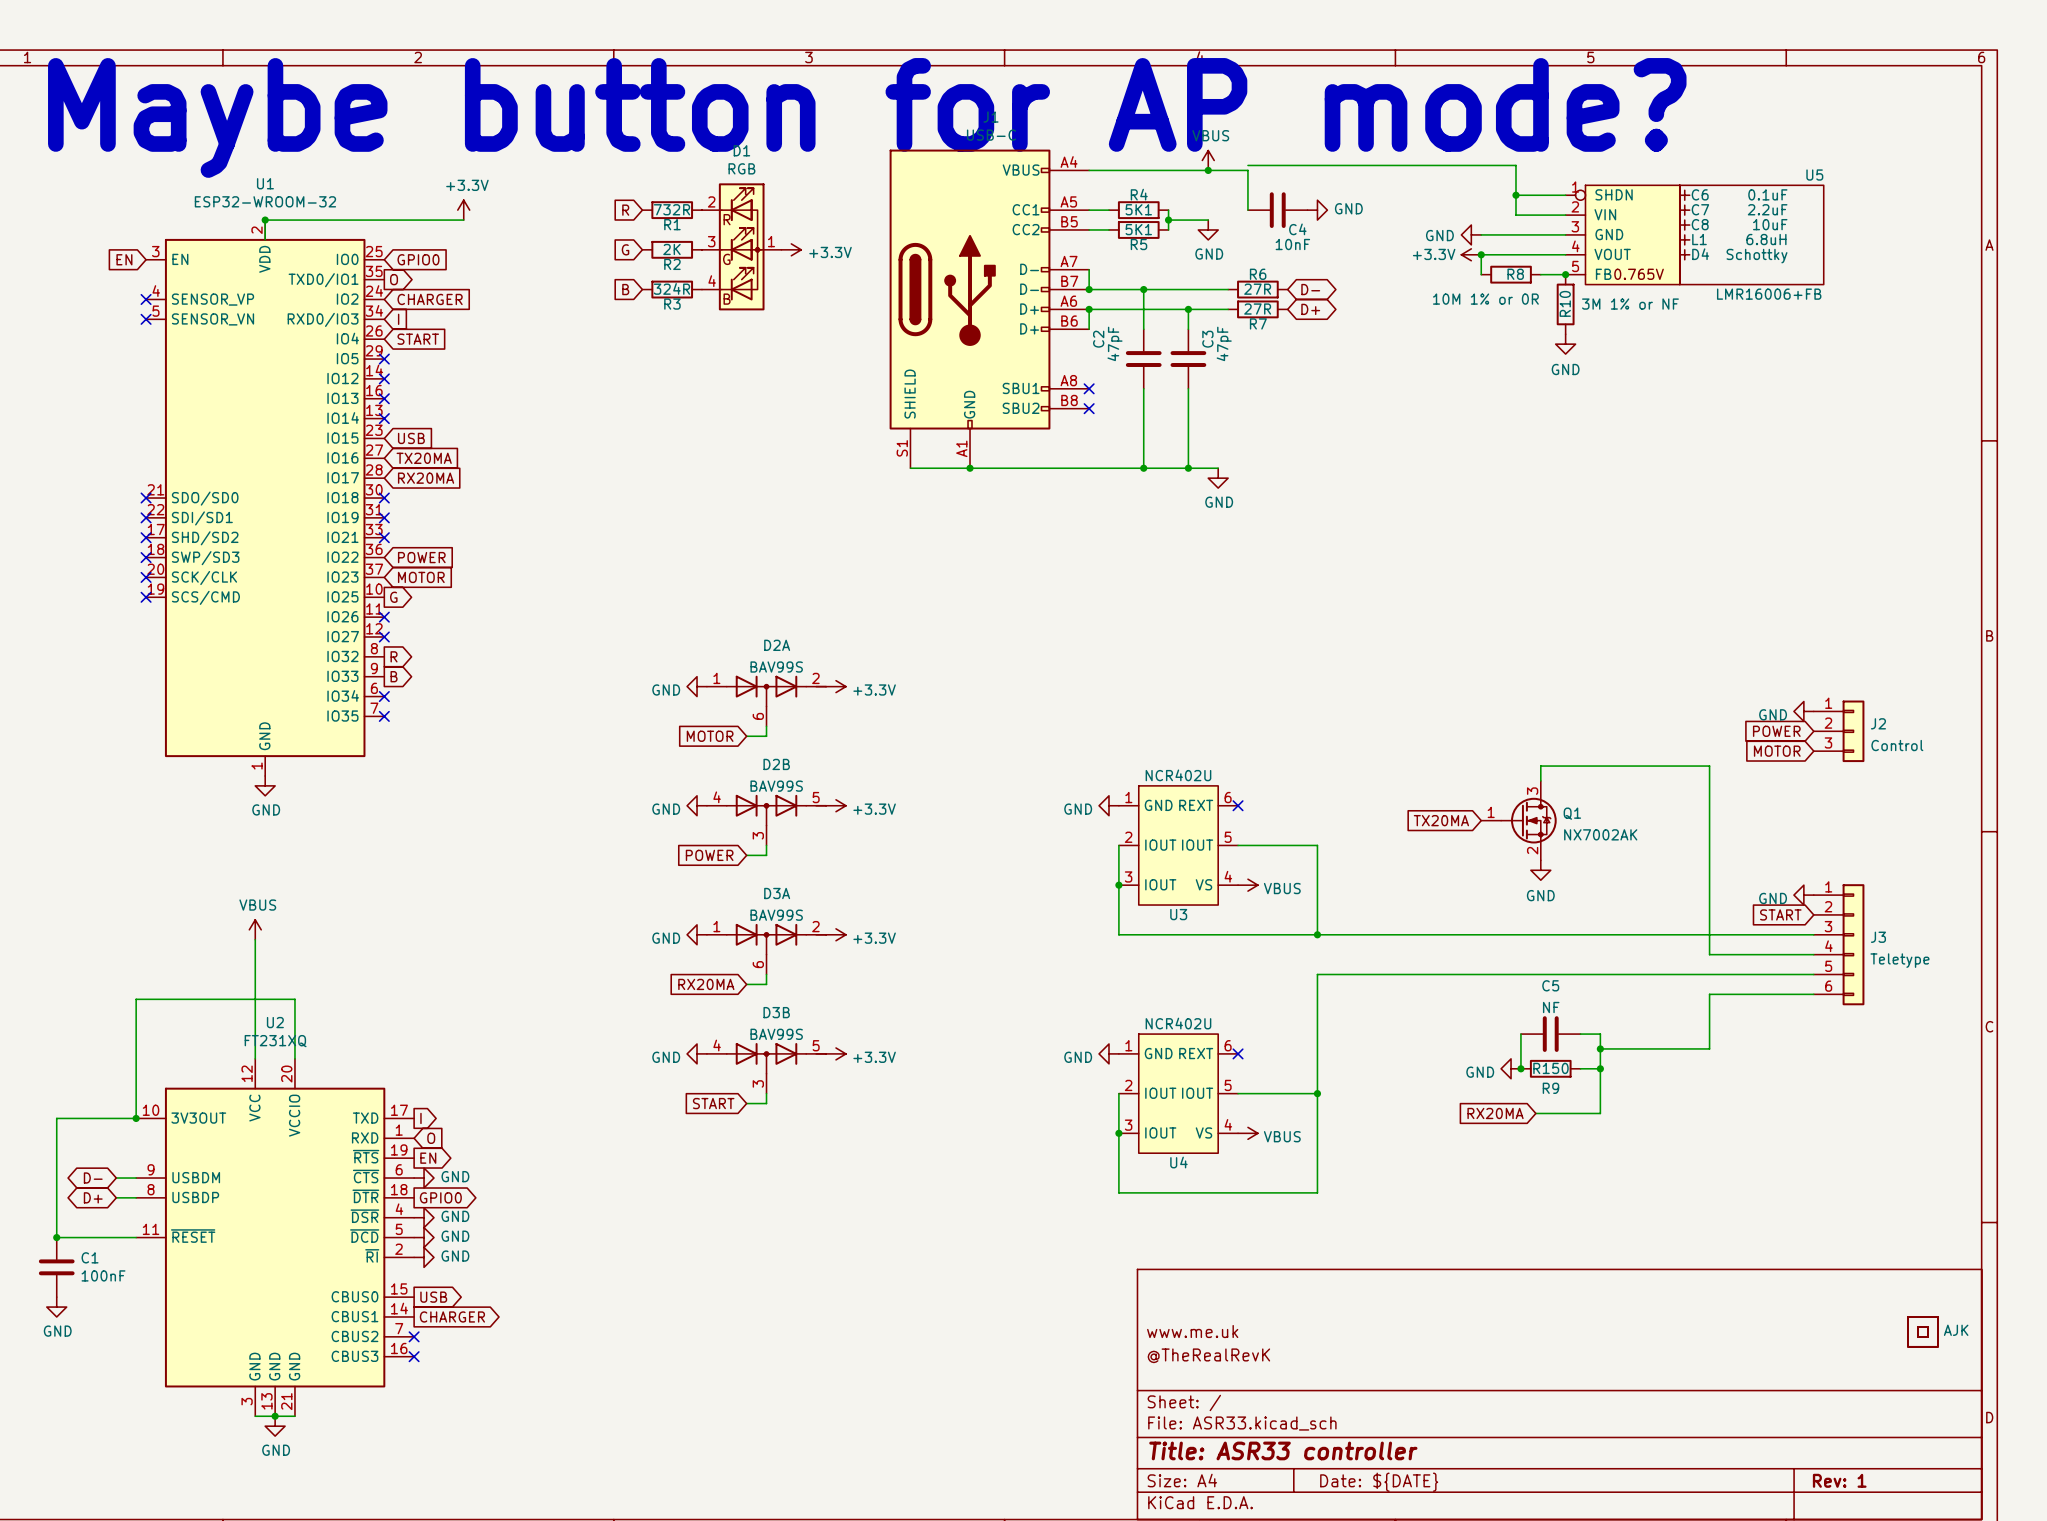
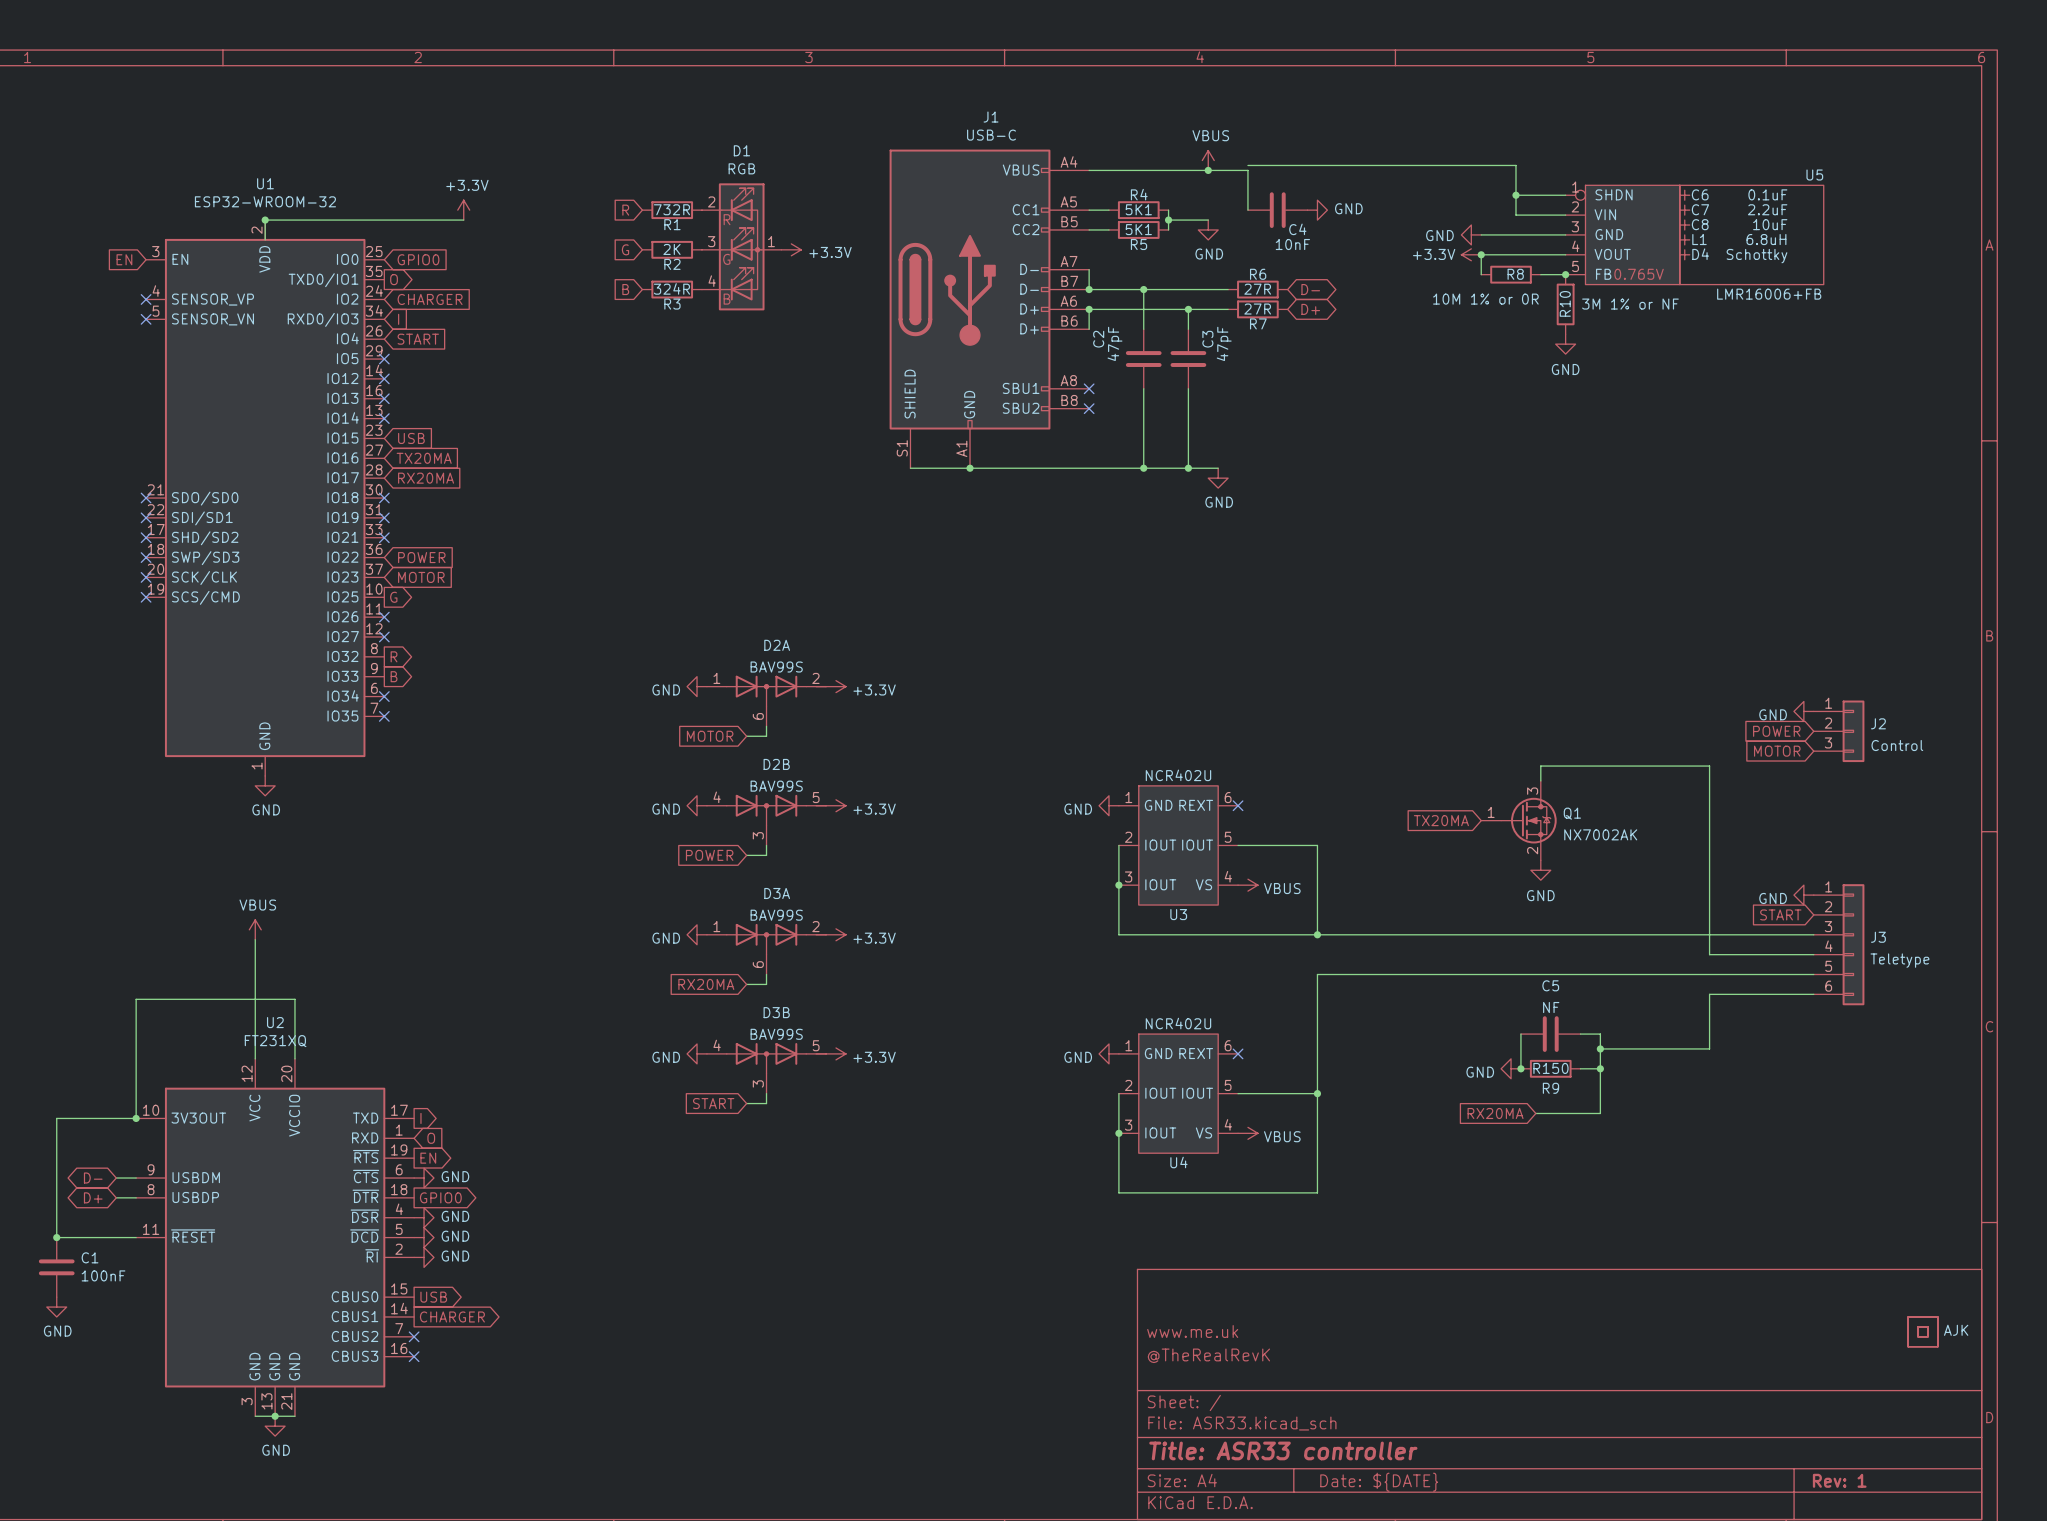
text: Maybe button for AP mode? (867, 117) -> none

